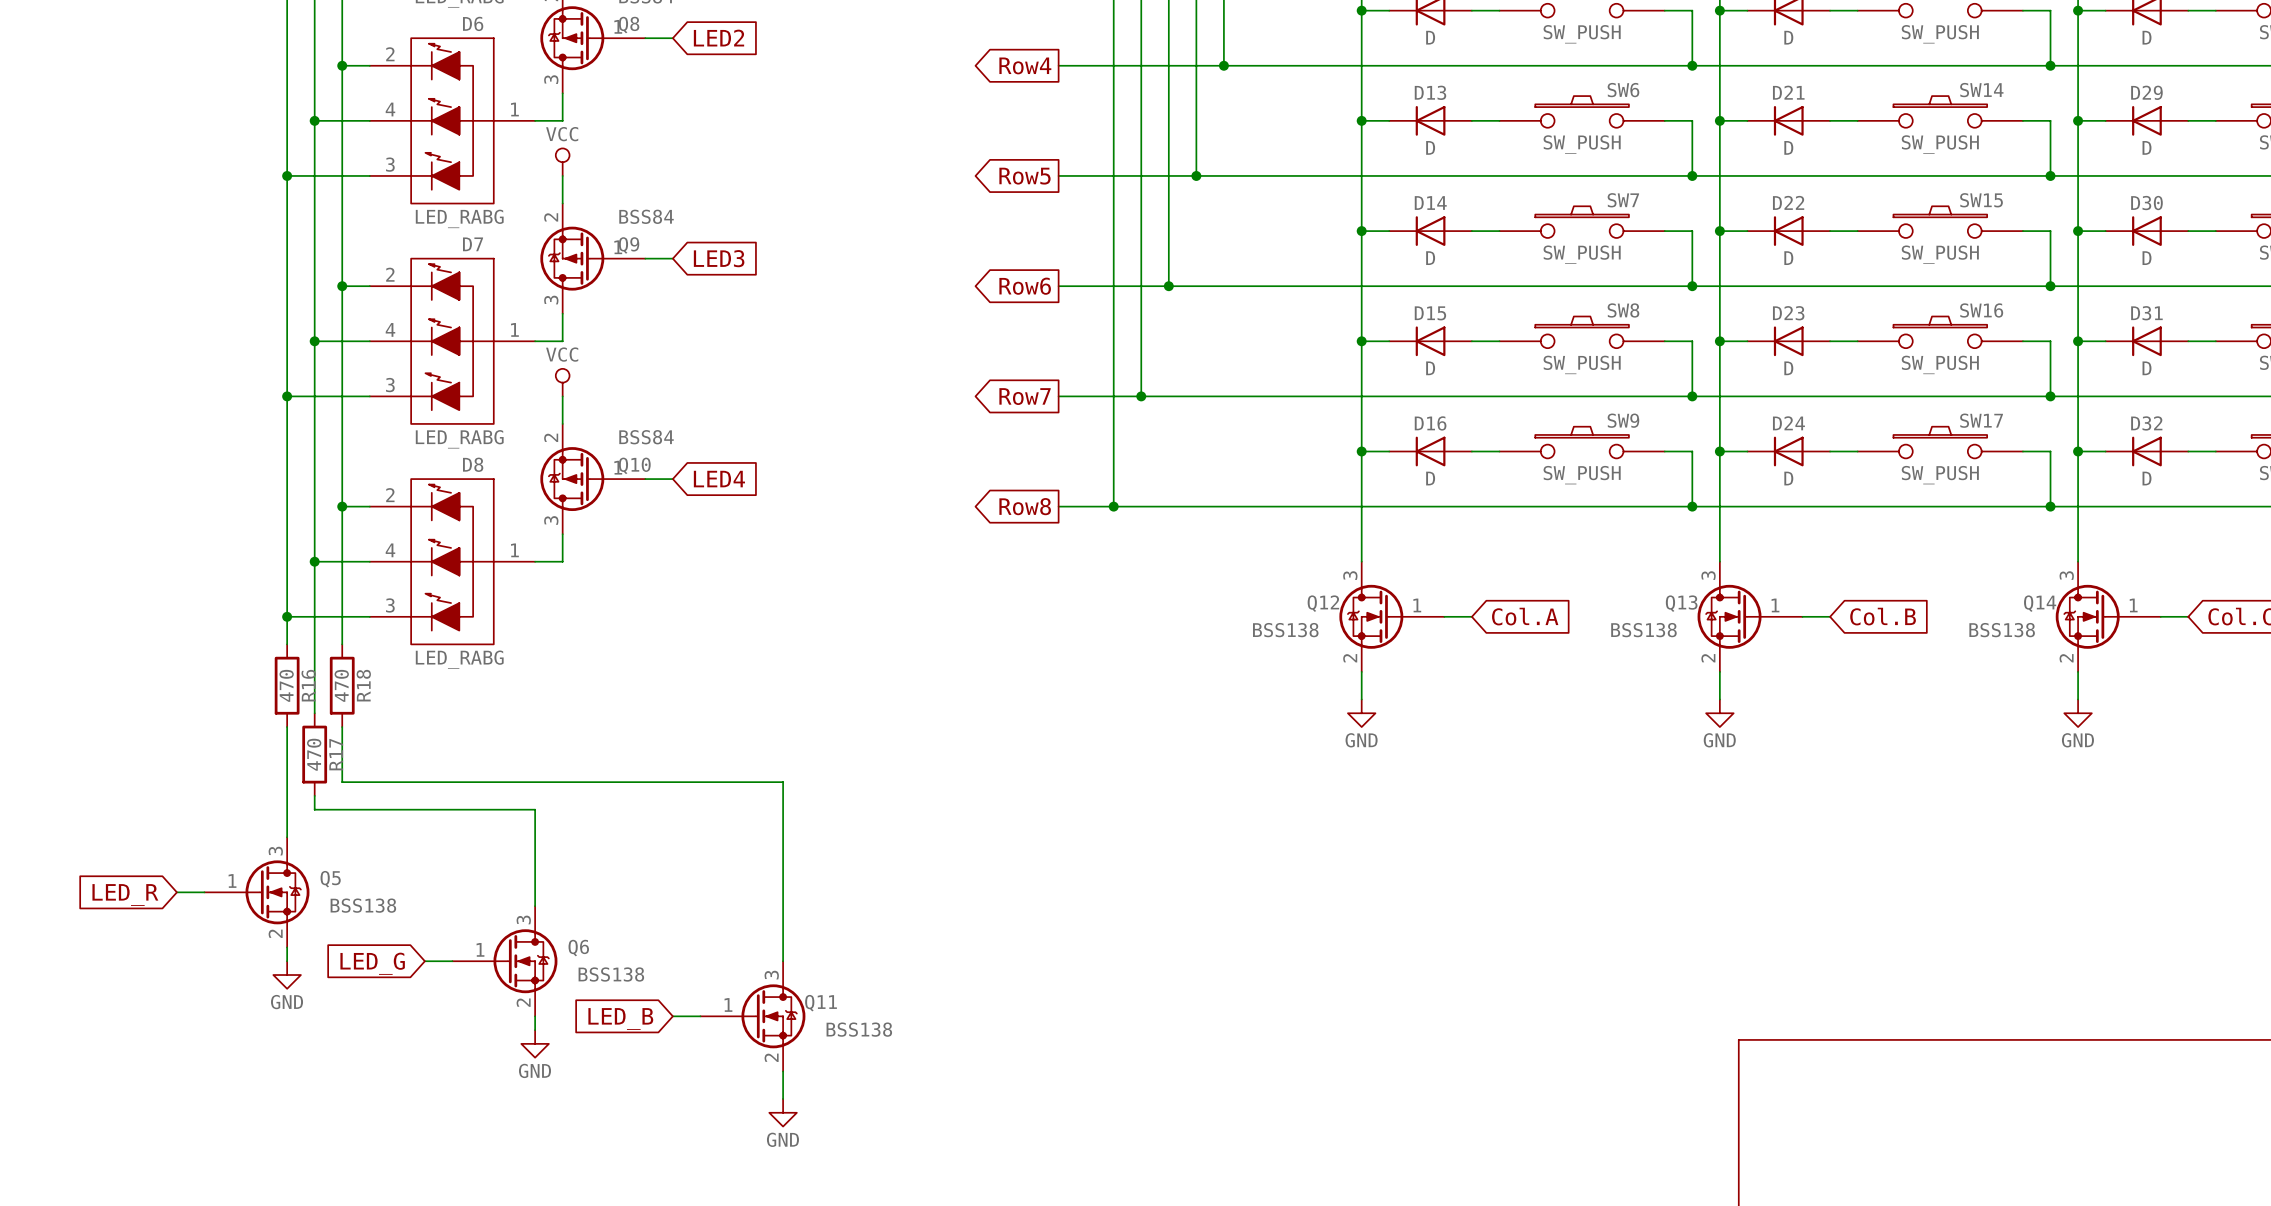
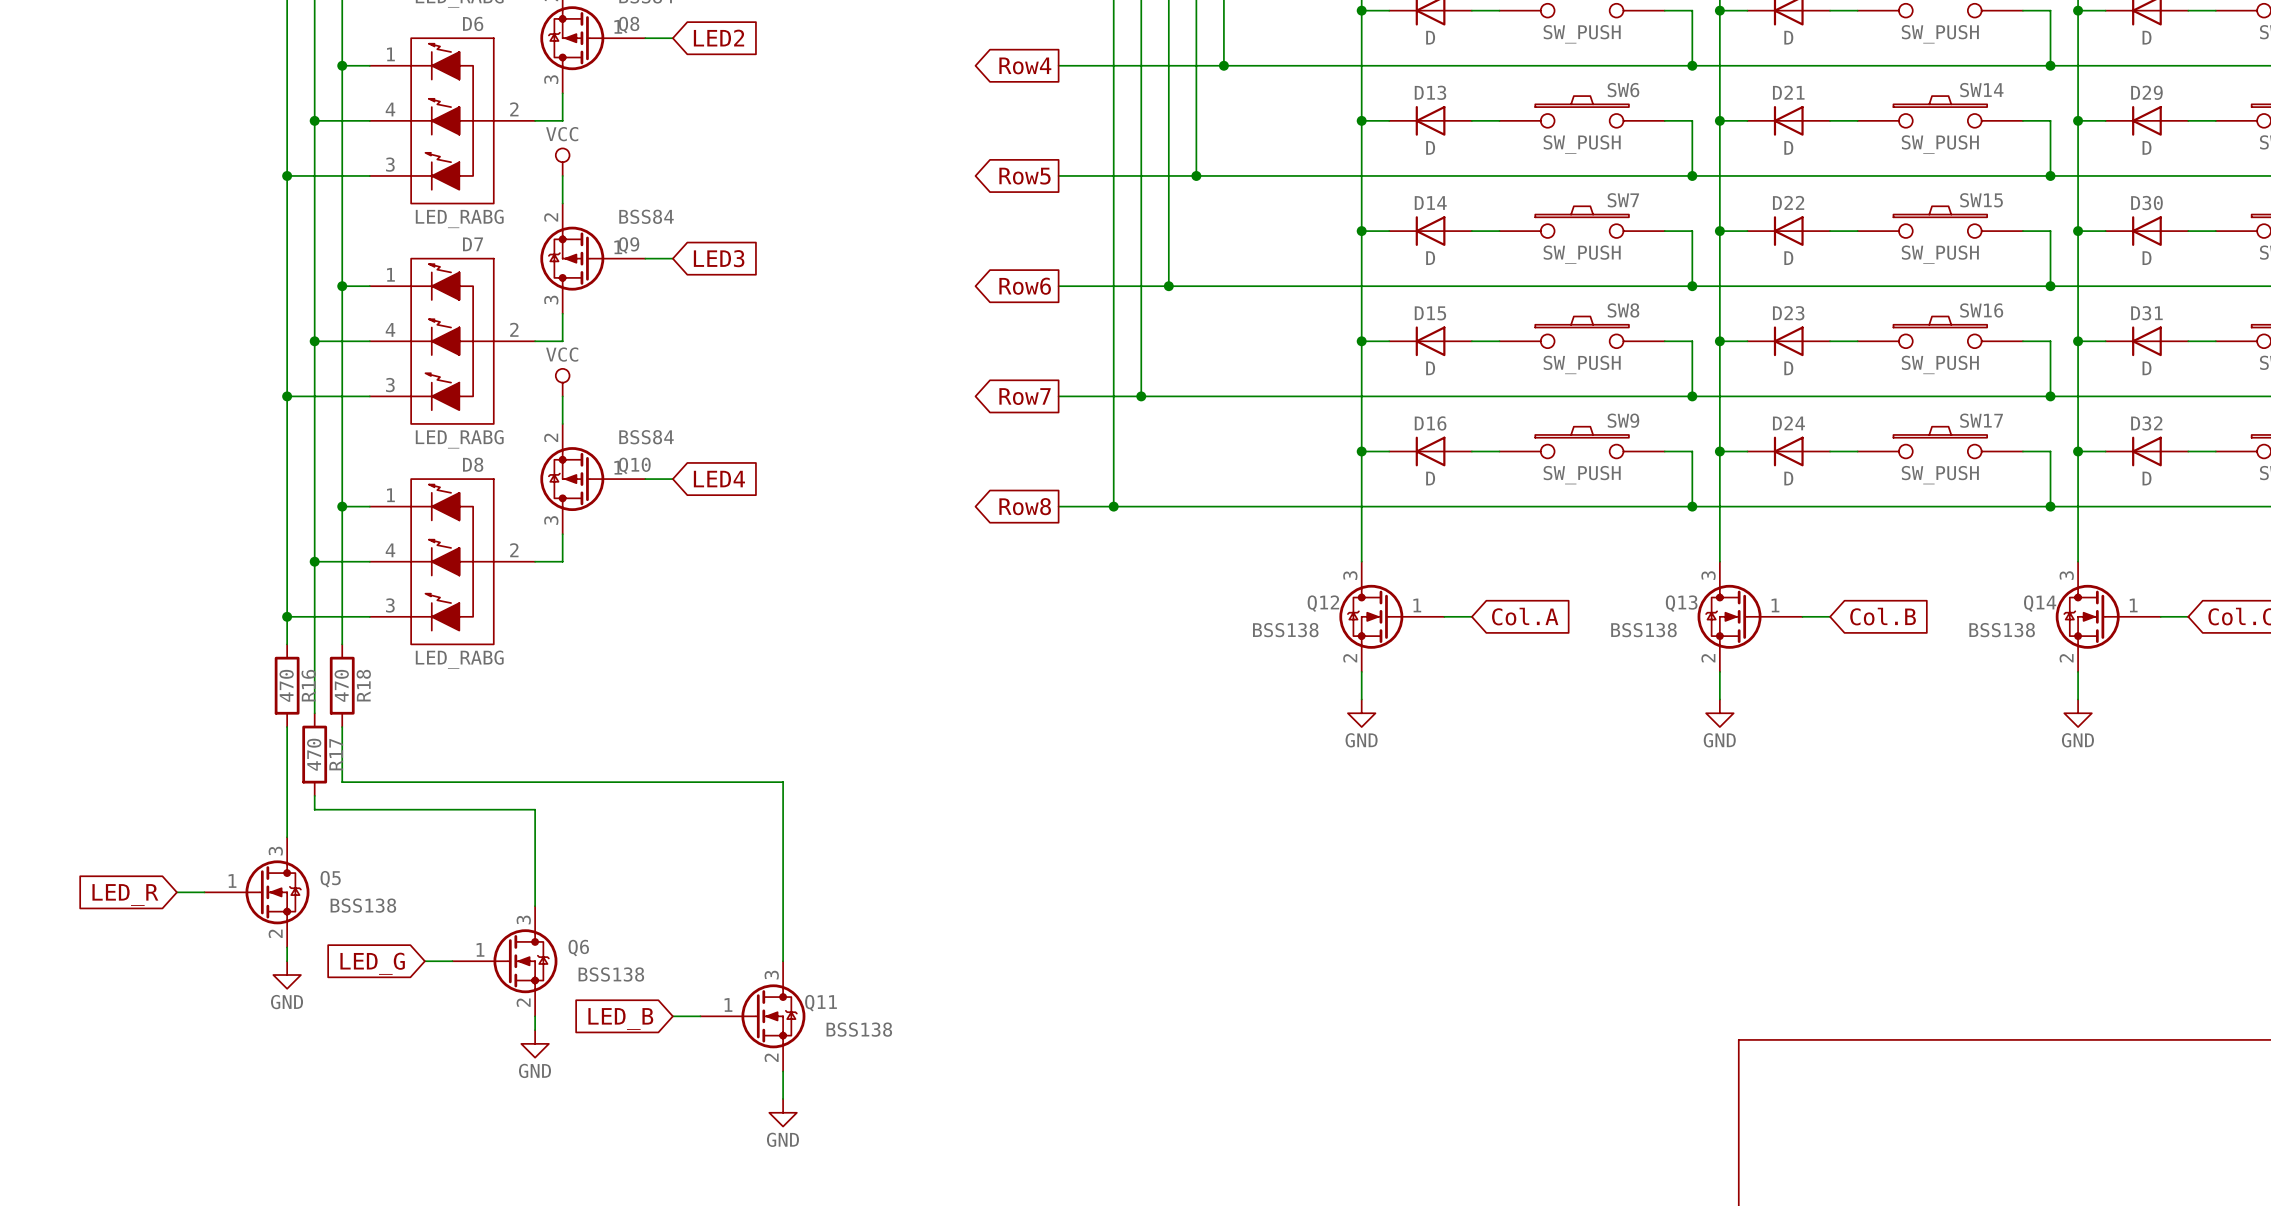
D6 pin number: 2 (390, 54) -> 1 (390, 54)
D6 pin number: 1 (514, 109) -> 2 (514, 109)
D7 pin number: 2 (390, 274) -> 1 (390, 274)
D7 pin number: 1 (514, 329) -> 2 (514, 329)
D8 pin number: 2 (390, 495) -> 1 (390, 495)
D8 pin number: 1 (514, 550) -> 2 (514, 550)

